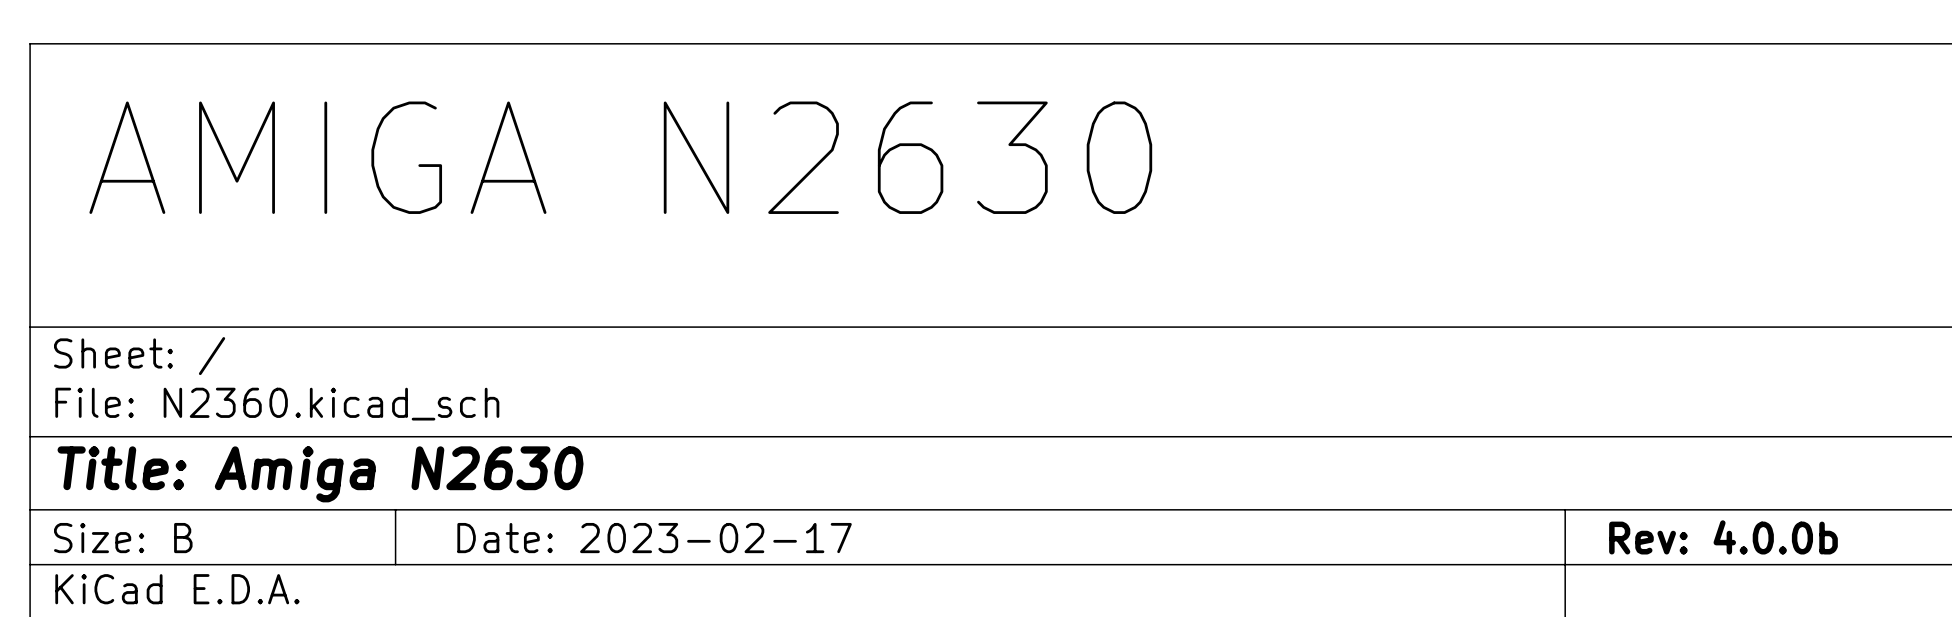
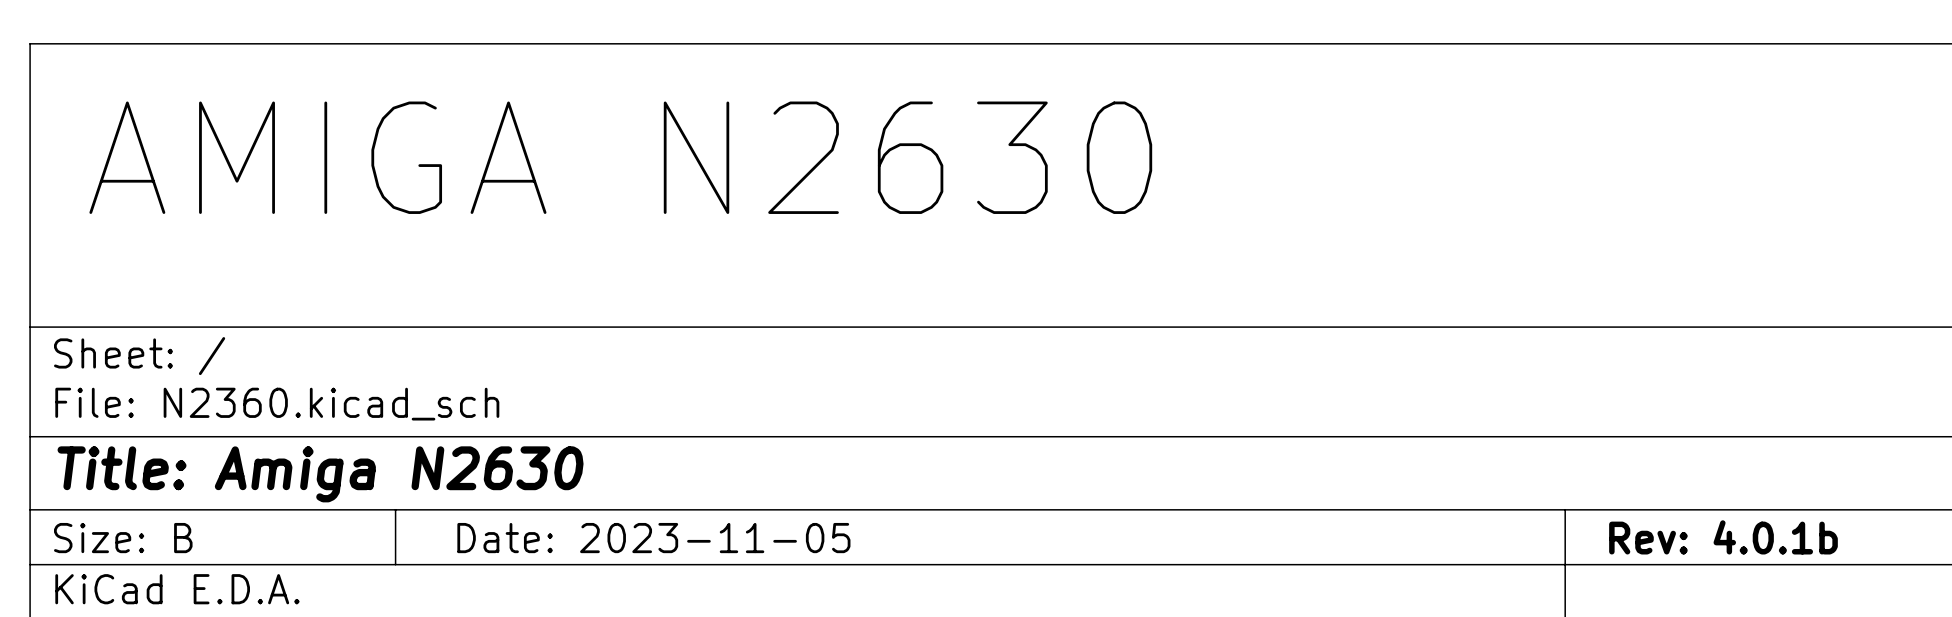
title block: Rev: 4.0.0b (1723, 537) -> Rev: 4.0.1b (1723, 537)
title block: Date: 2023-02-17 (654, 538) -> Date: 2023-11-05 (653, 538)

